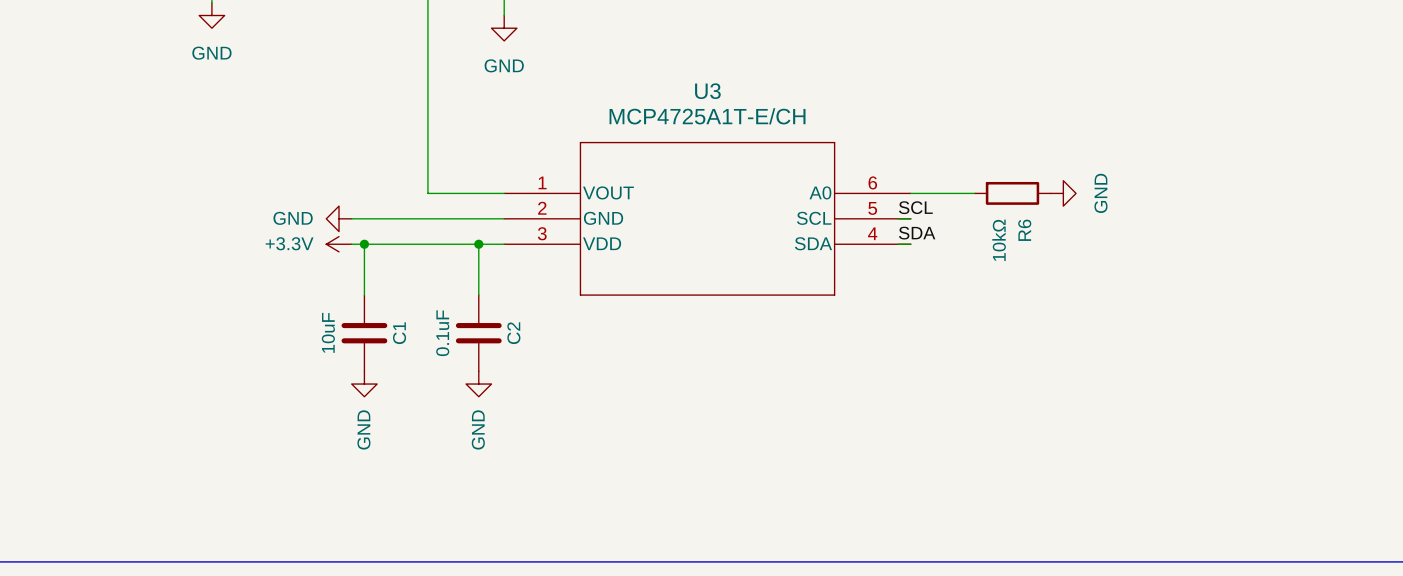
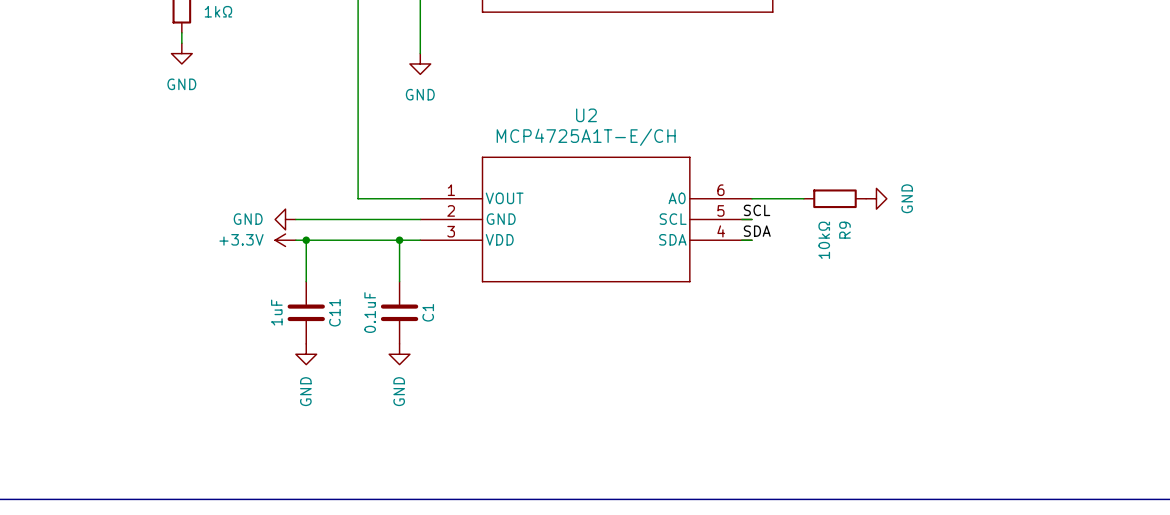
U3 name: U3 (707, 91) -> U2 (586, 115)
R6 name: R6 (1024, 230) -> R9 (844, 230)
C1 value: 10uF (328, 332) -> 1uF (276, 312)
C1 name: C1 (399, 333) -> C11 (334, 312)
C2 name: C2 (513, 333) -> C1 (428, 312)

